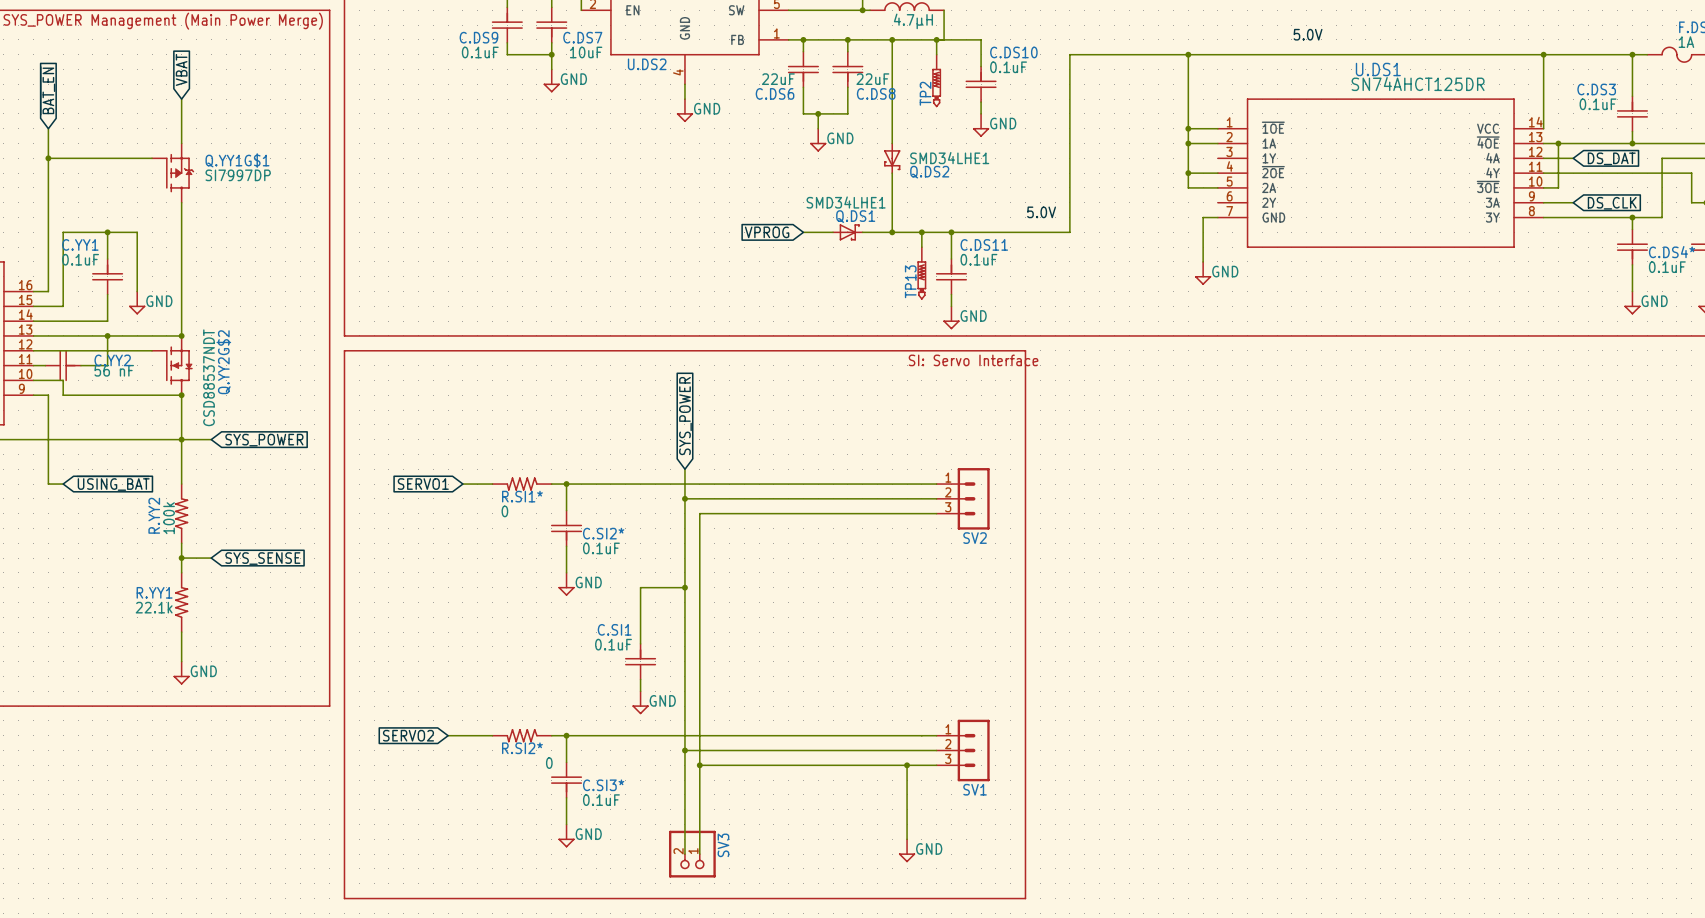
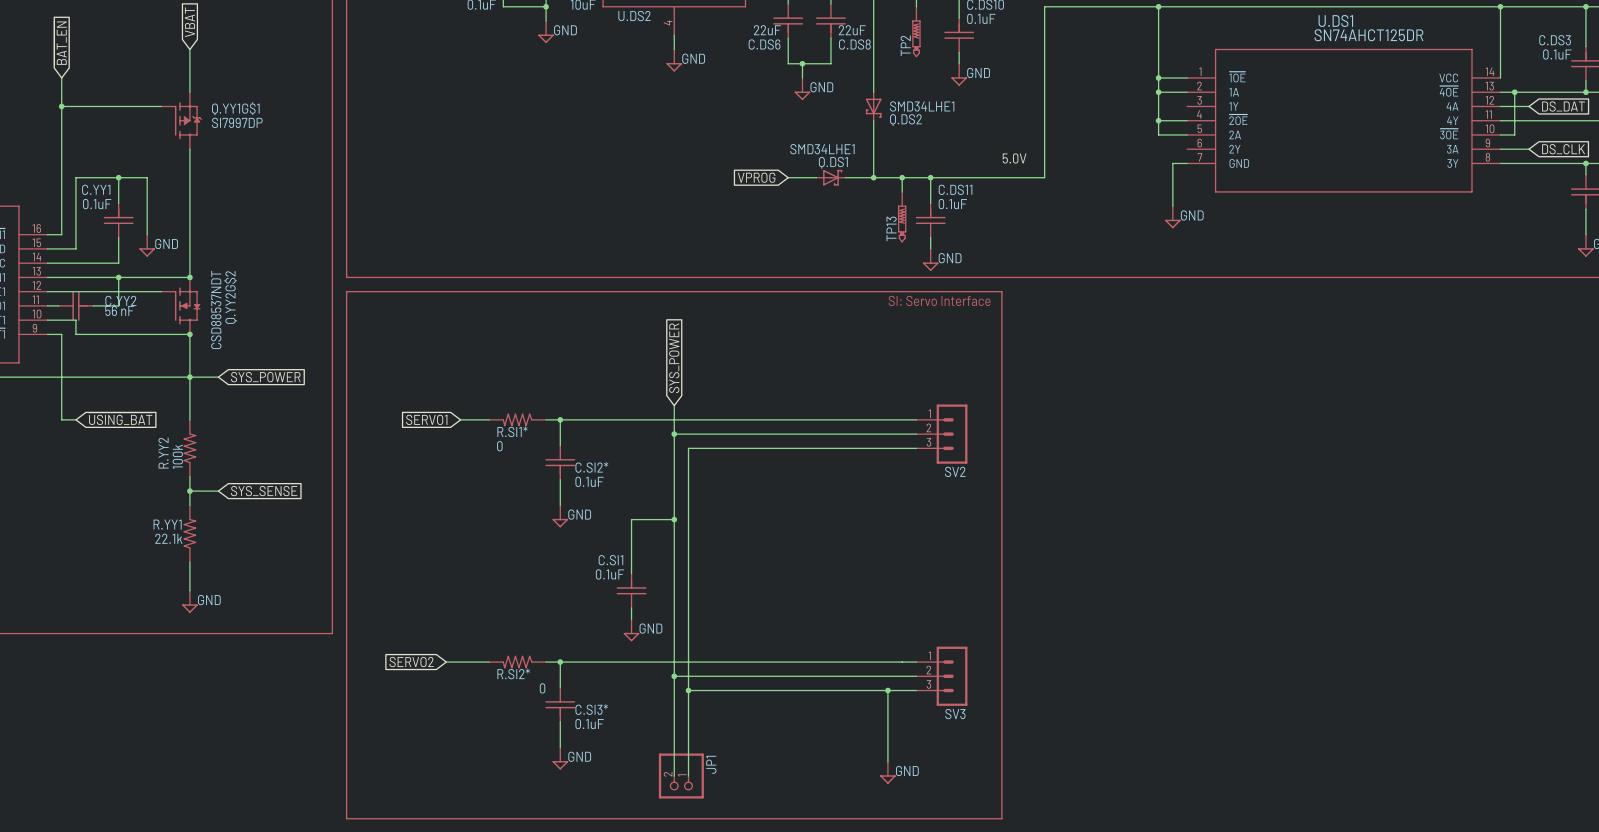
SV1 name: SV1 (975, 789) -> SV3 (955, 714)
SV3 name: SV3 (723, 845) -> JP1 (711, 764)

